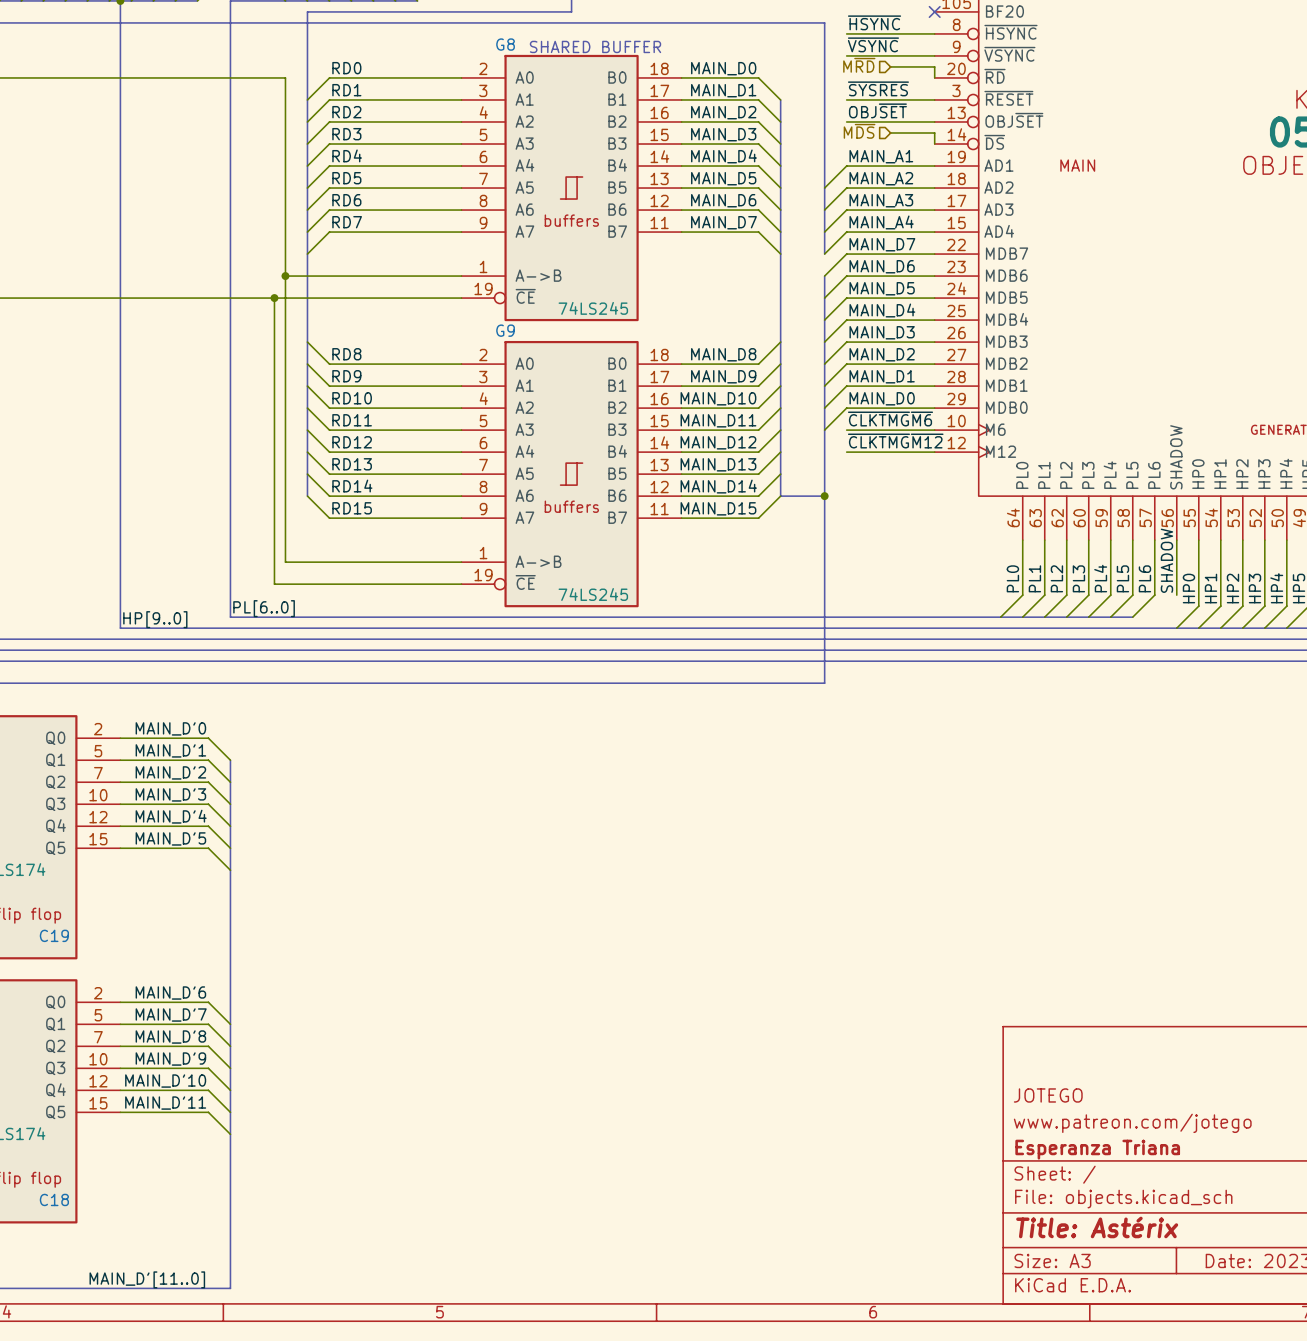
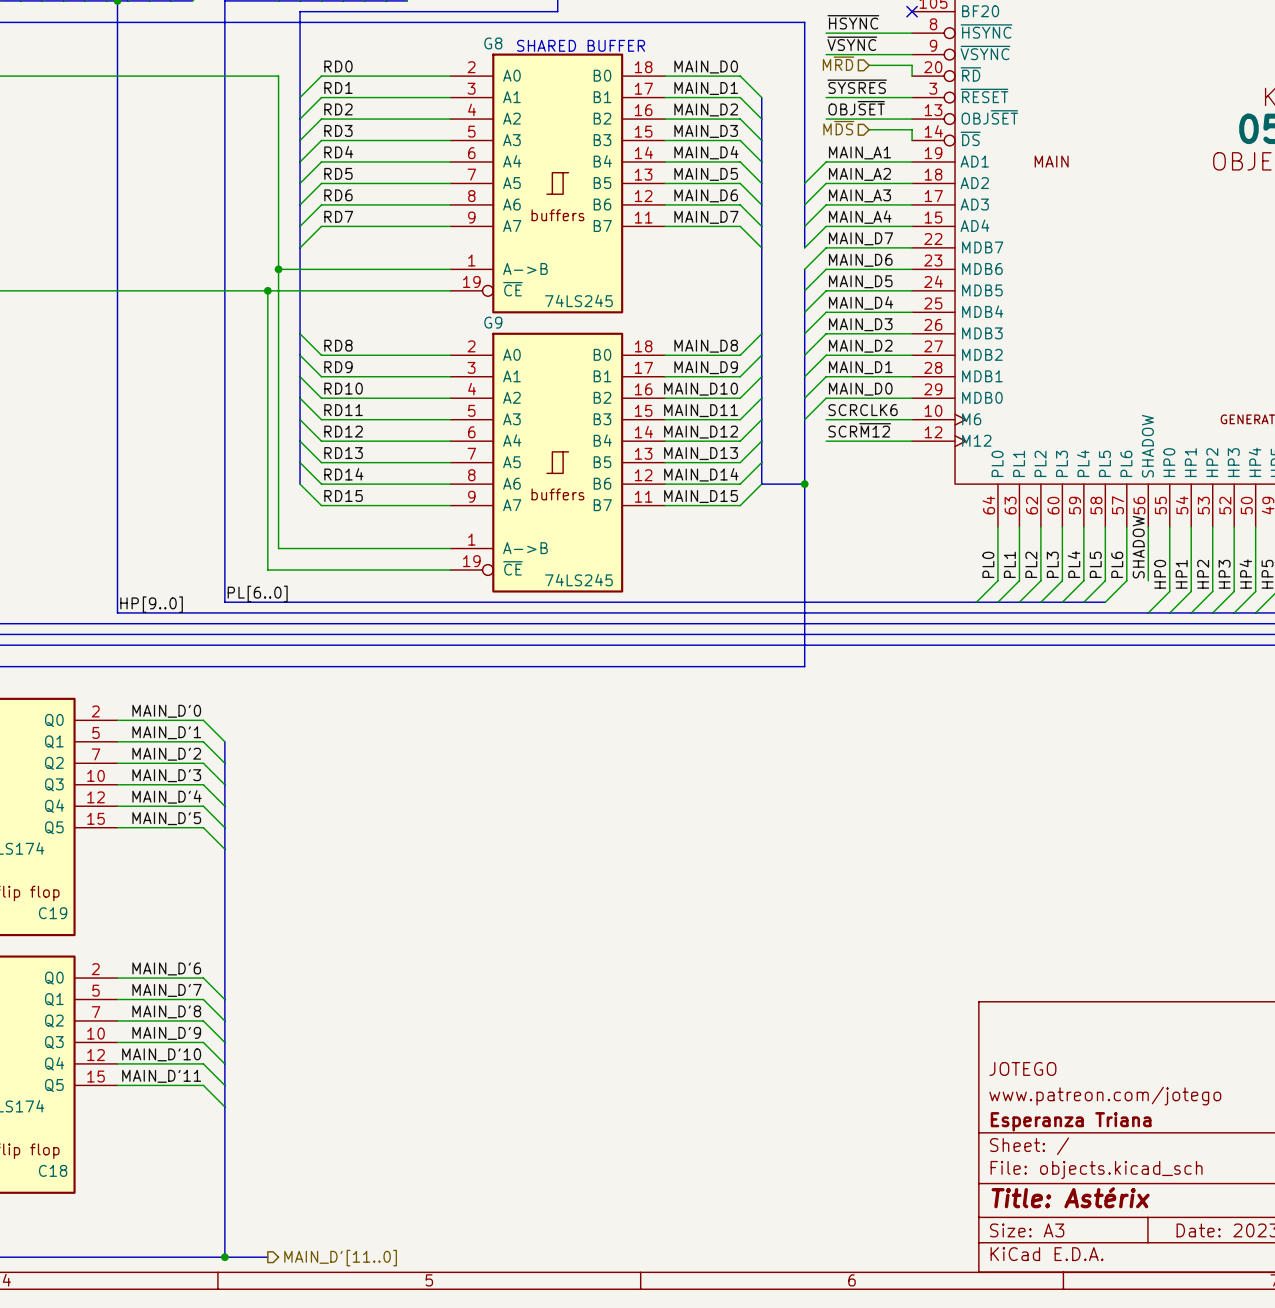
label: ~{CLKTMG}~{M6} (890, 419) -> SCRCLK6 (863, 410)
label: ~{CLKTMG}~{M12} (895, 441) -> SCR~{M12} (859, 430)
label: MAIN_D'[11..0] (147, 1279) -> none
bus: none -> (224, 1257) (267, 1257)
junction: none -> (224, 1257)
hierarchical label: none -> MAIN_D'[11..0] (340, 1258)

